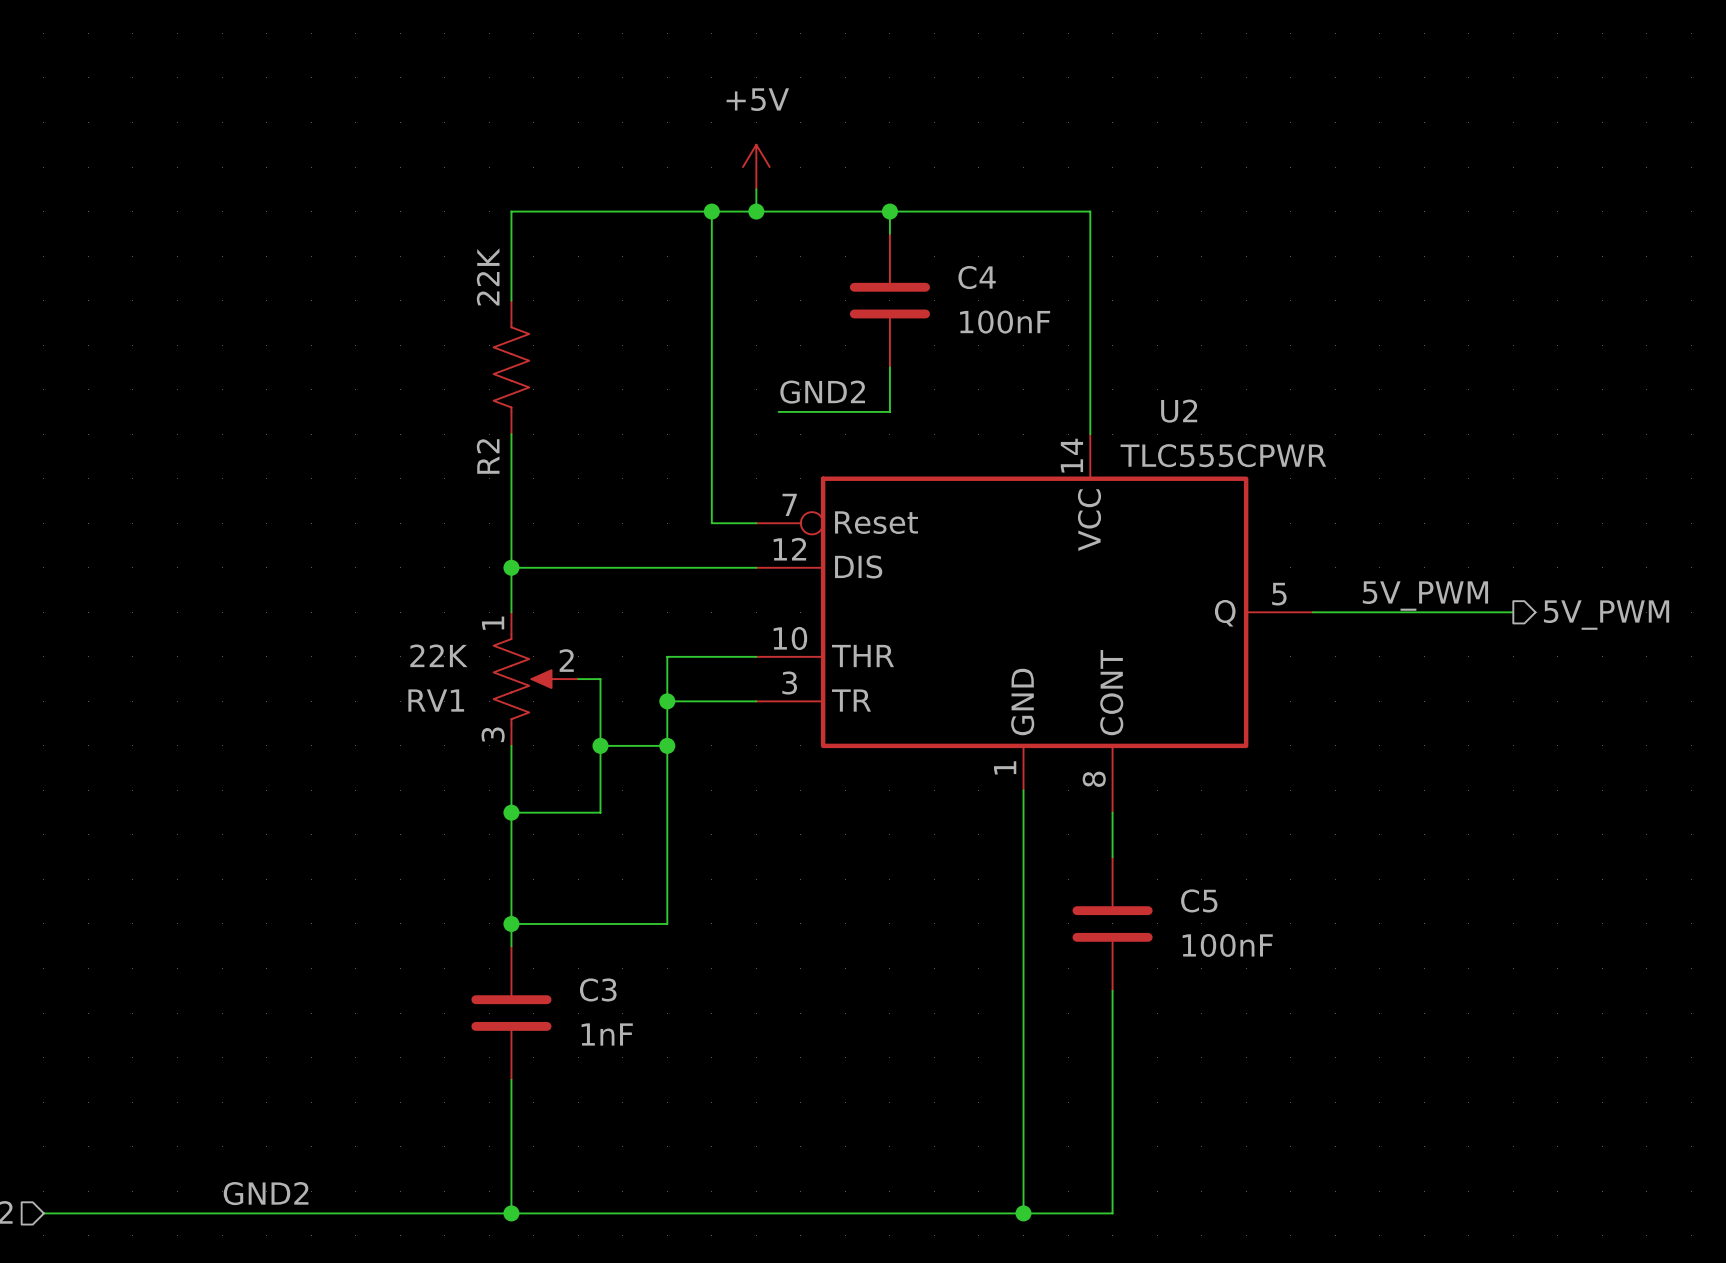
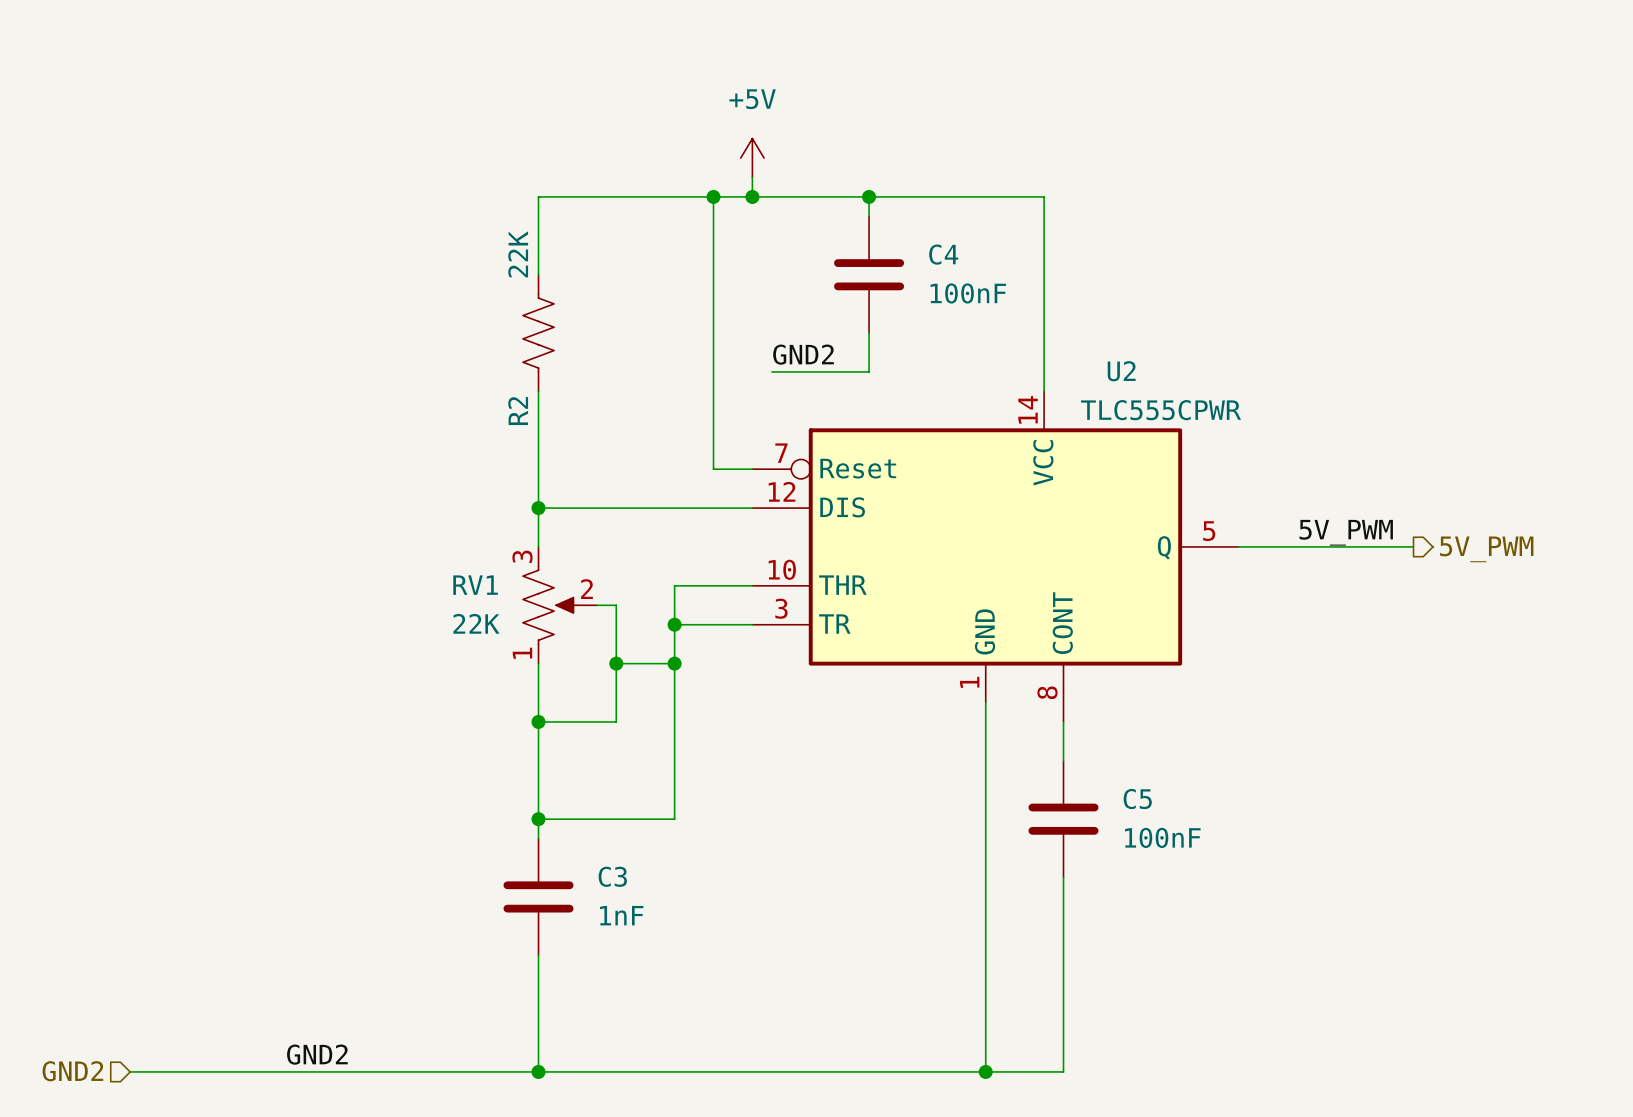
RV1 pin number: 1 (493, 623) -> 3 (522, 556)
RV1 value position: 22K (438, 655) -> 22K (476, 623)
RV1 name position: RV1 (436, 700) -> RV1 (475, 585)
RV1 pin number: 3 (493, 734) -> 1 (522, 653)

